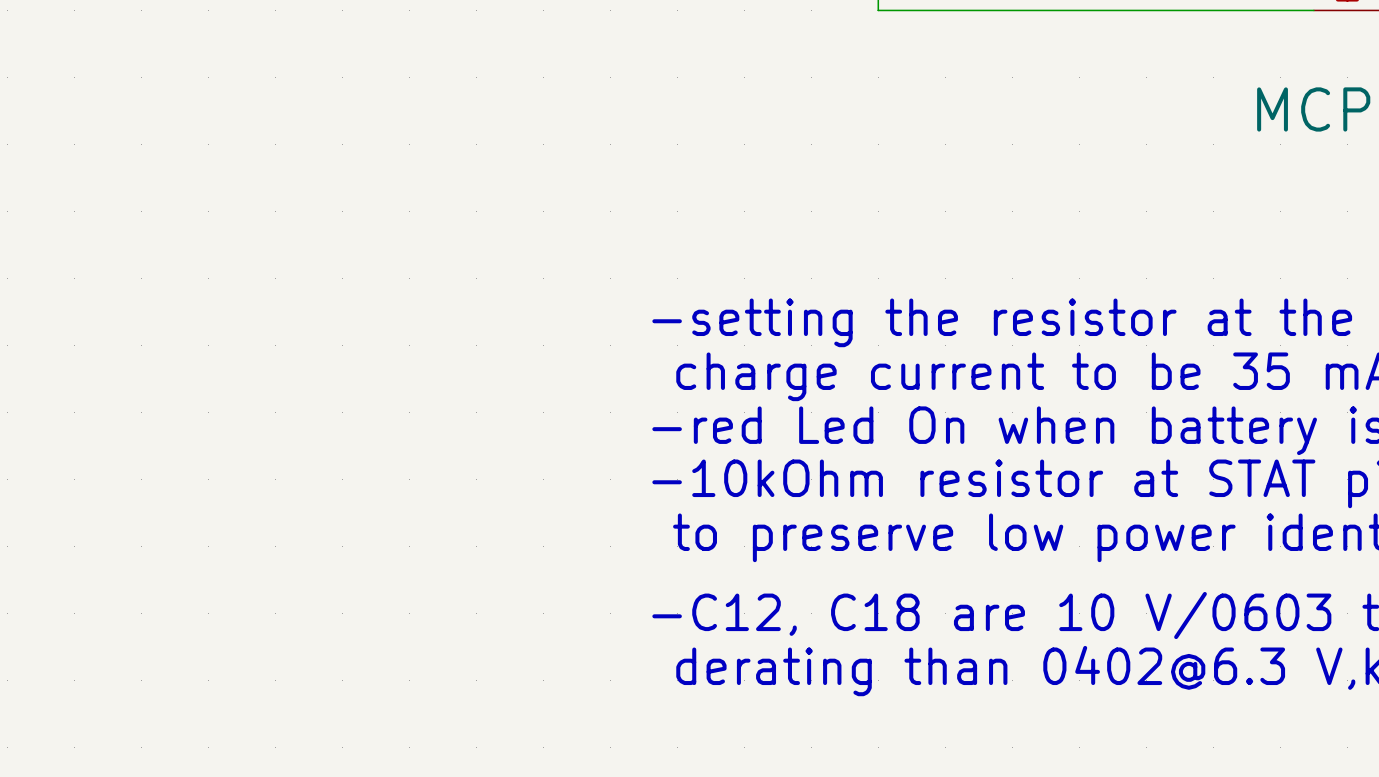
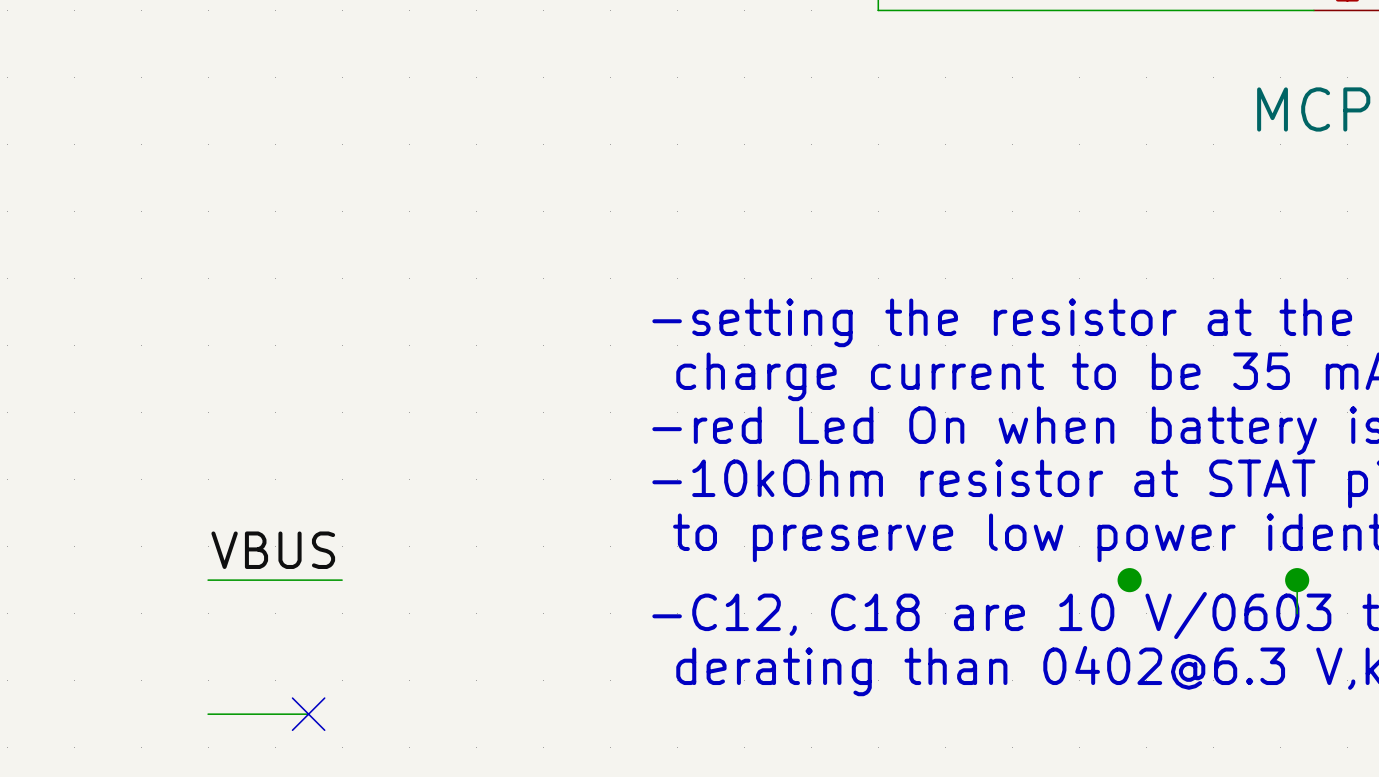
label: none -> VBUS (273, 550)
wire: none -> (208, 580) (342, 580)
junction: none -> (1129, 580)
wire: none -> (1297, 580) (1297, 613)
junction: none -> (1297, 580)
wire: none -> (208, 714) (308, 714)
no-connect mark: none -> (308, 714)

